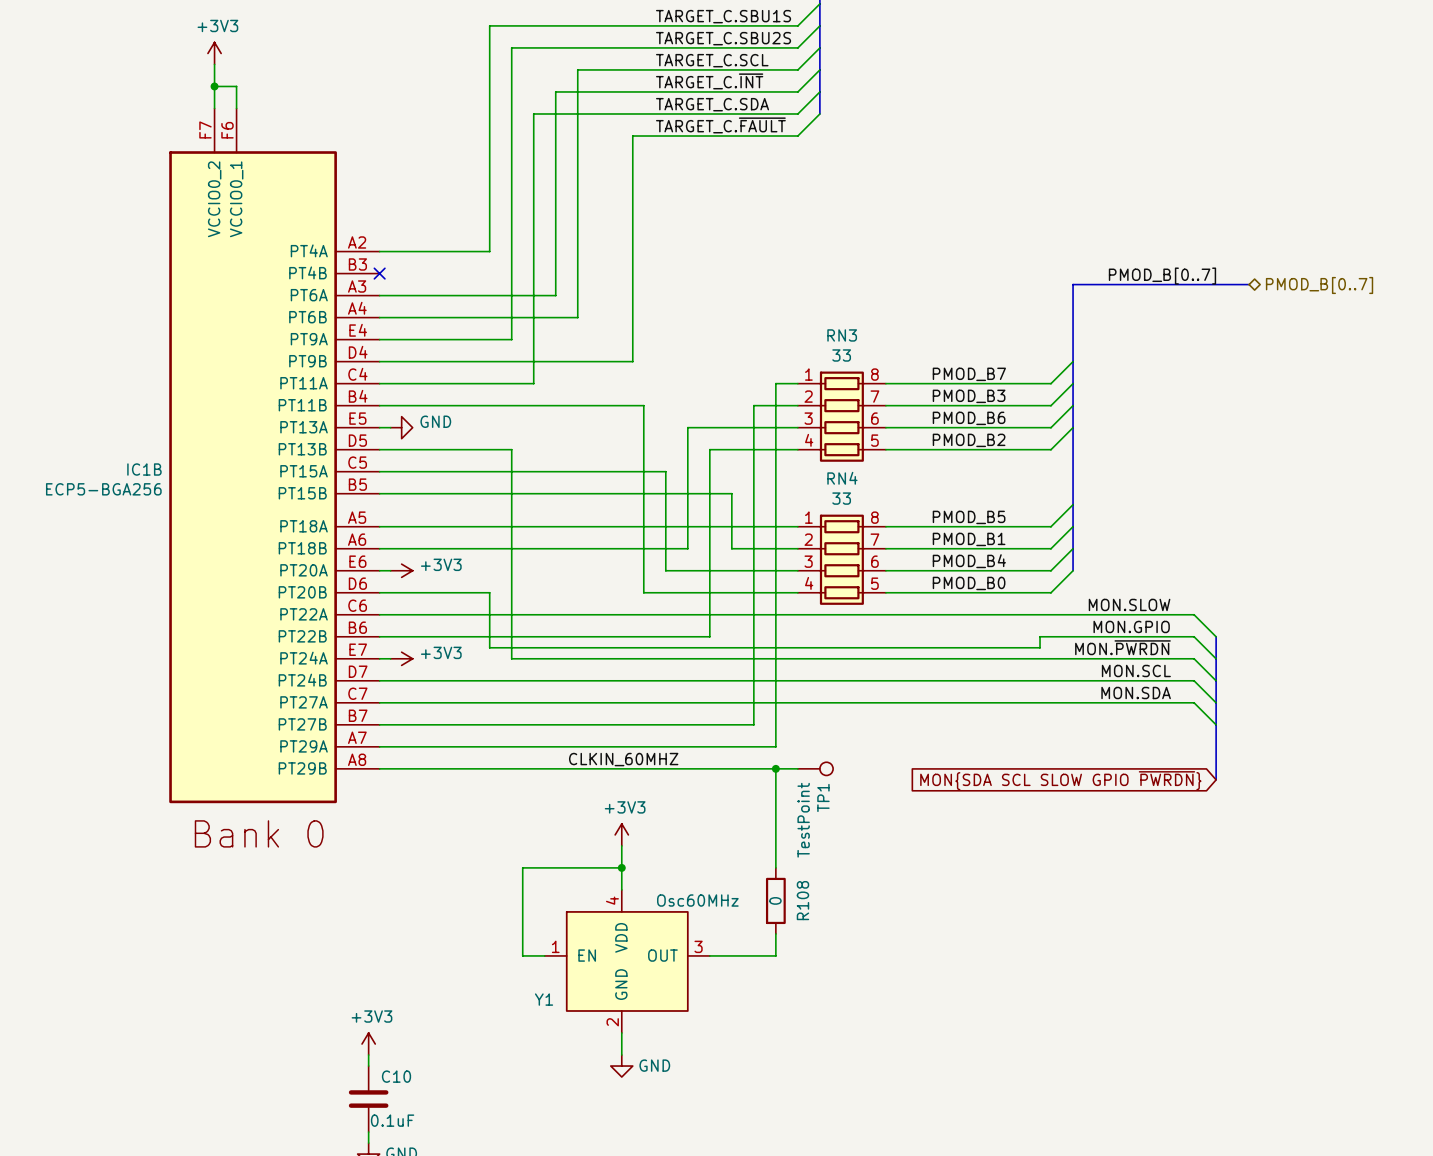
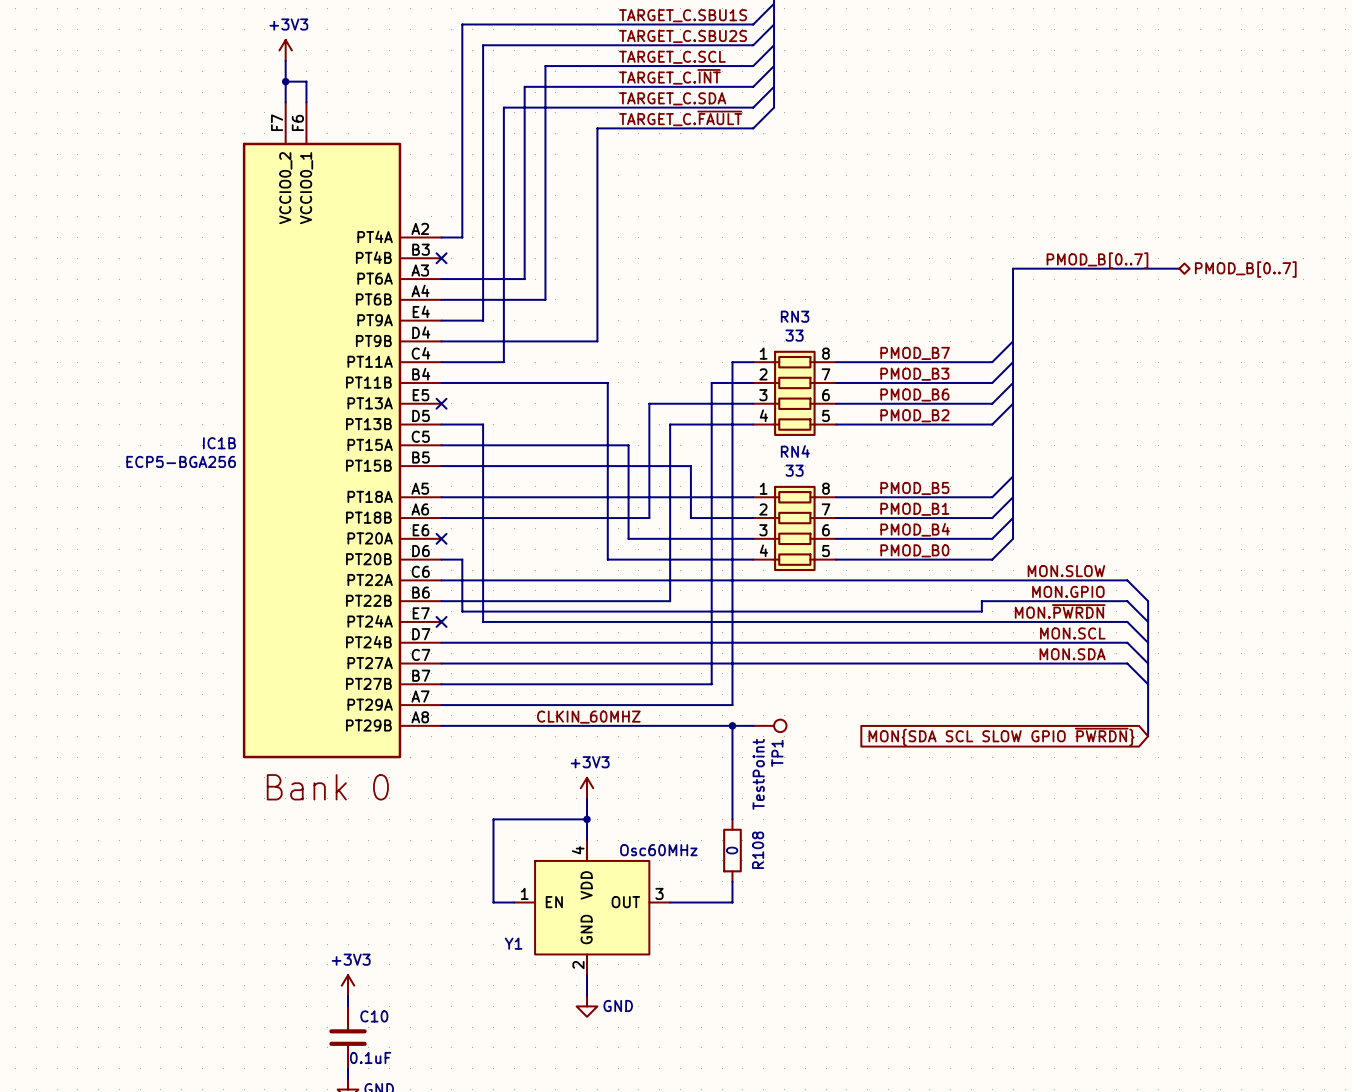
power symbol position: +3V3 (214, 53) -> +3V3 (285, 50)
wire: (214, 64) (214, 108) -> (285, 60) (285, 102)
wire: (214, 86) (236, 86) (236, 108) -> (285, 81) (306, 81) (306, 102)
junction: (214, 86) -> none
junction: none -> (285, 81)
no-connect mark: (379, 273) -> none
no-connect mark: none -> (441, 258)
power symbol: GND (401, 427) -> none
no-connect mark: none -> (441, 403)
IC1B position: (274, 455) -> (342, 430)
power symbol: +3V3 (401, 570) -> none
no-connect mark: none -> (441, 538)
power symbol: +3V3 (401, 658) -> none
no-connect mark: none -> (441, 621)

